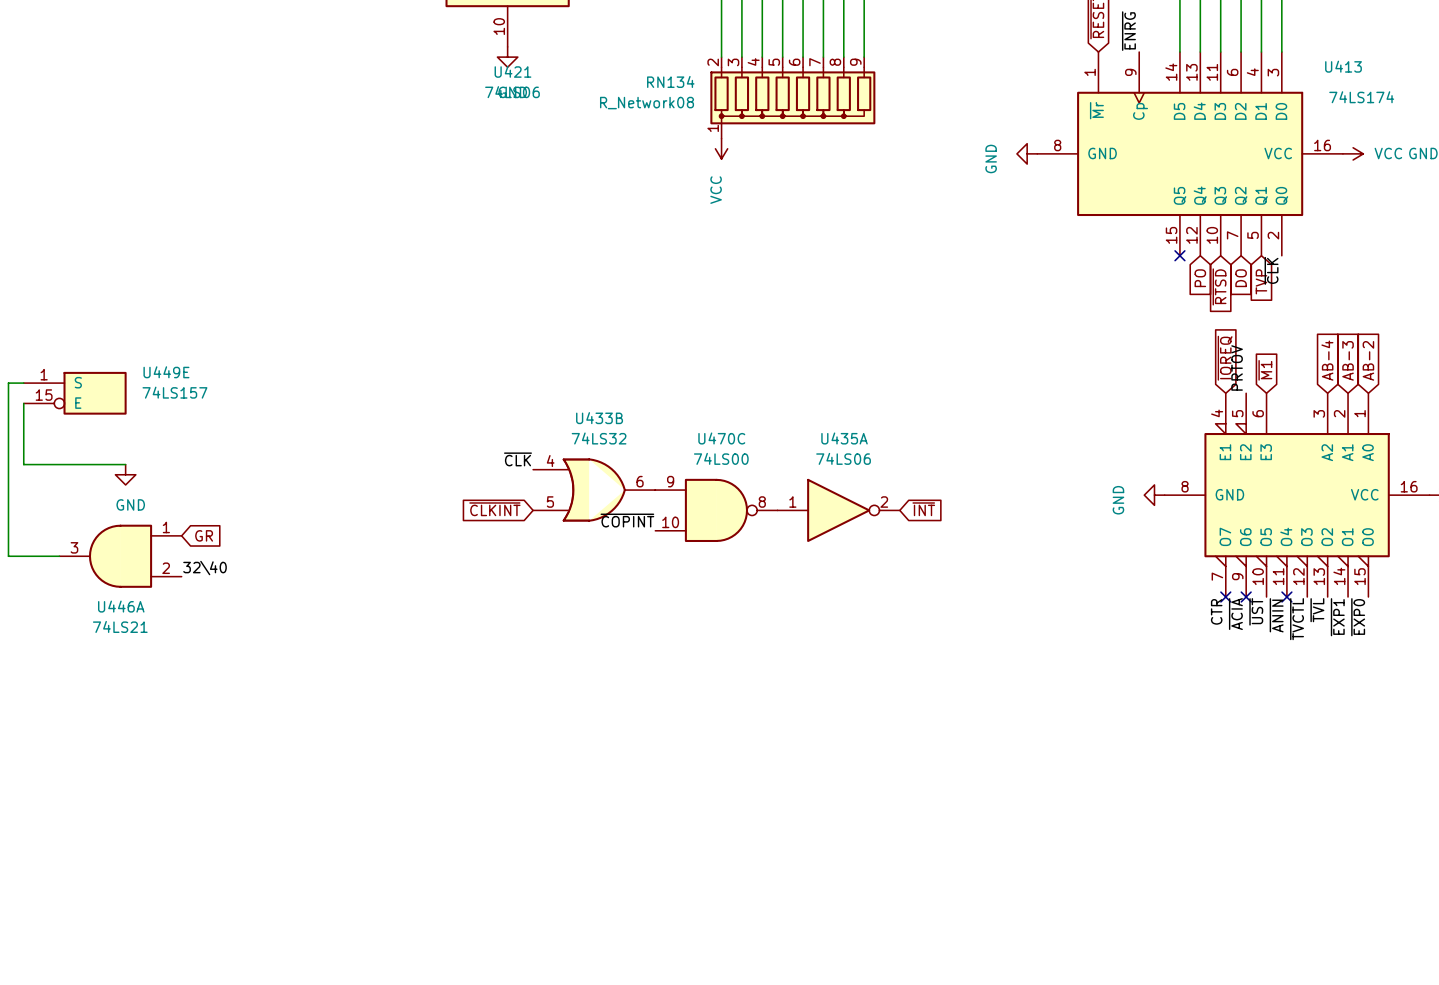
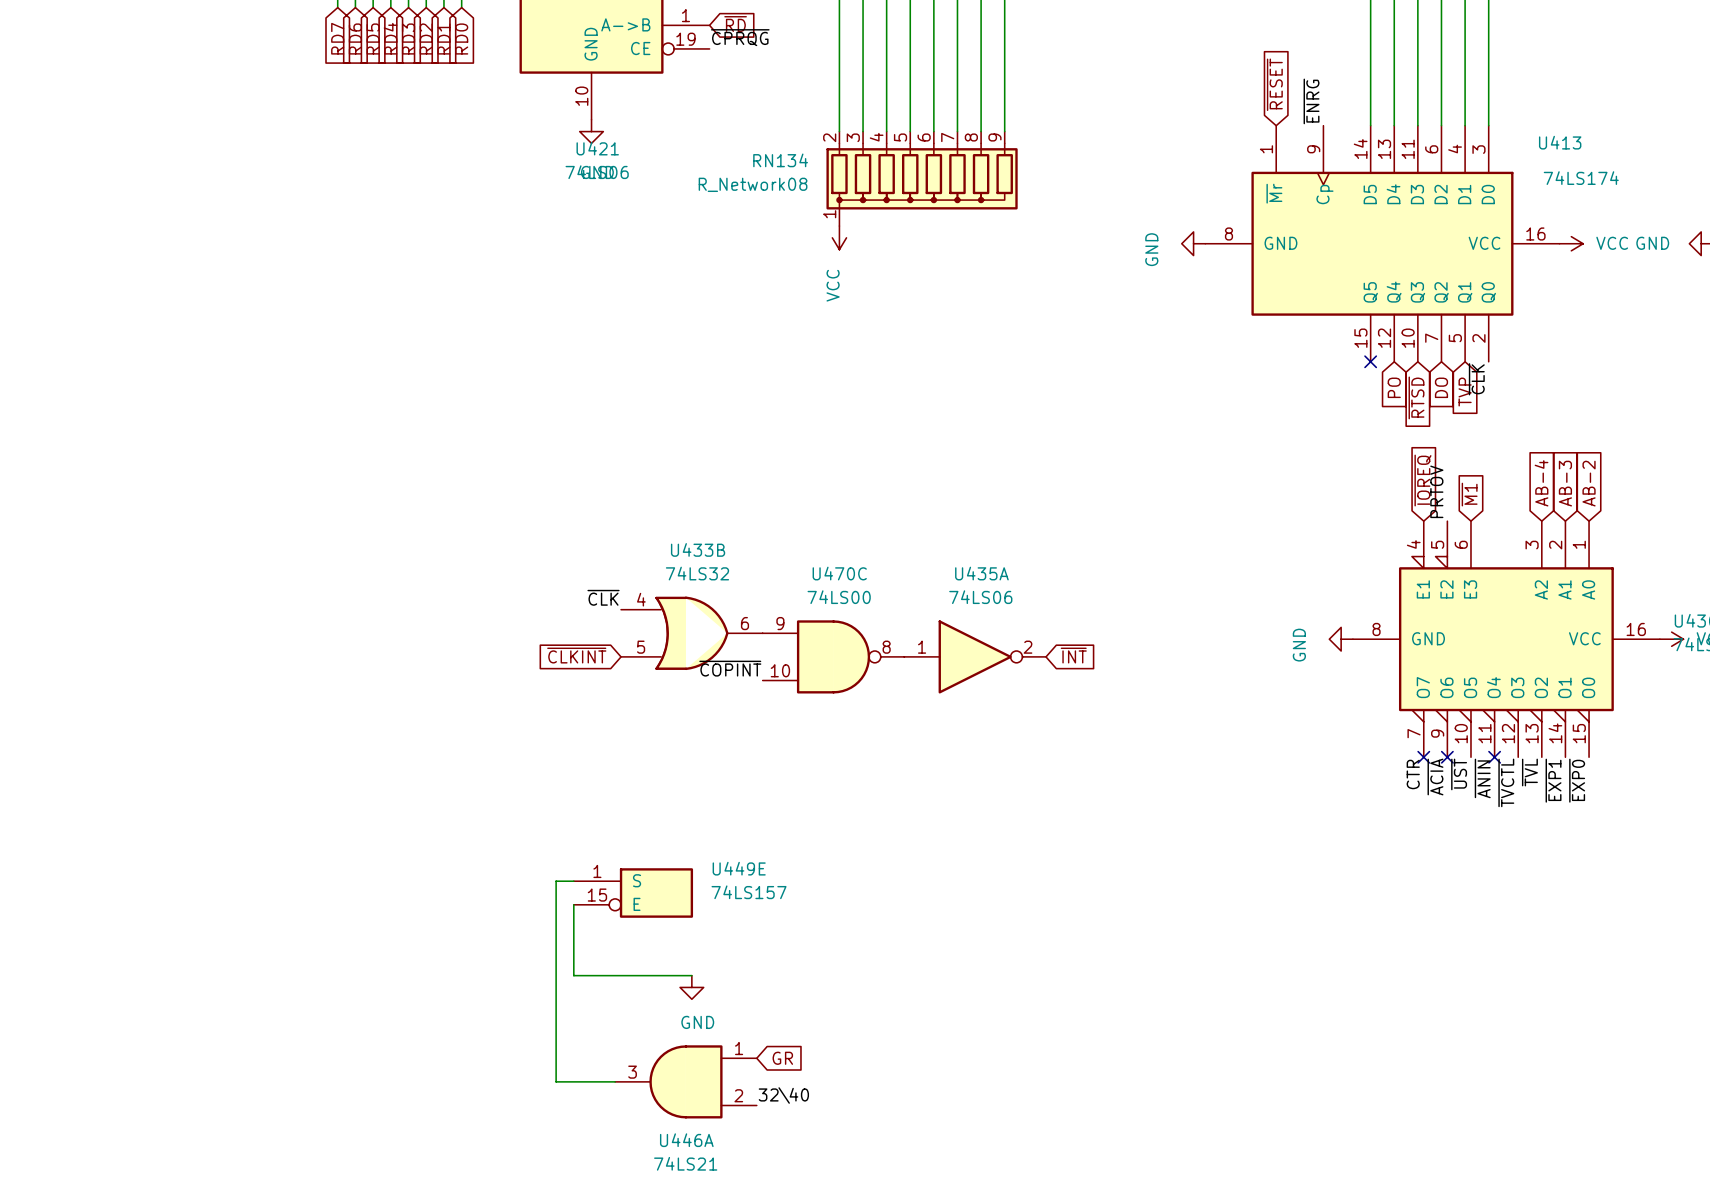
wire: (23, 383) (8, 383) (8, 556) (59, 556) -> none
U449E position: (75, 393) -> (633, 893)
wire: (23, 403) (23, 464) (125, 464) -> none
power symbol: GND (125, 474) -> none
global label: GR (204, 535) -> none
U446A position: (120, 556) -> (685, 1081)
label: 32\40 (205, 568) -> none
wire: none -> (573, 881) (556, 881) (556, 1081) (615, 1081)
wire: none -> (573, 904) (573, 975) (691, 975)
power symbol: none -> GND (691, 987)
global label: none -> GR (782, 1058)
label: none -> 32\40 (783, 1095)

